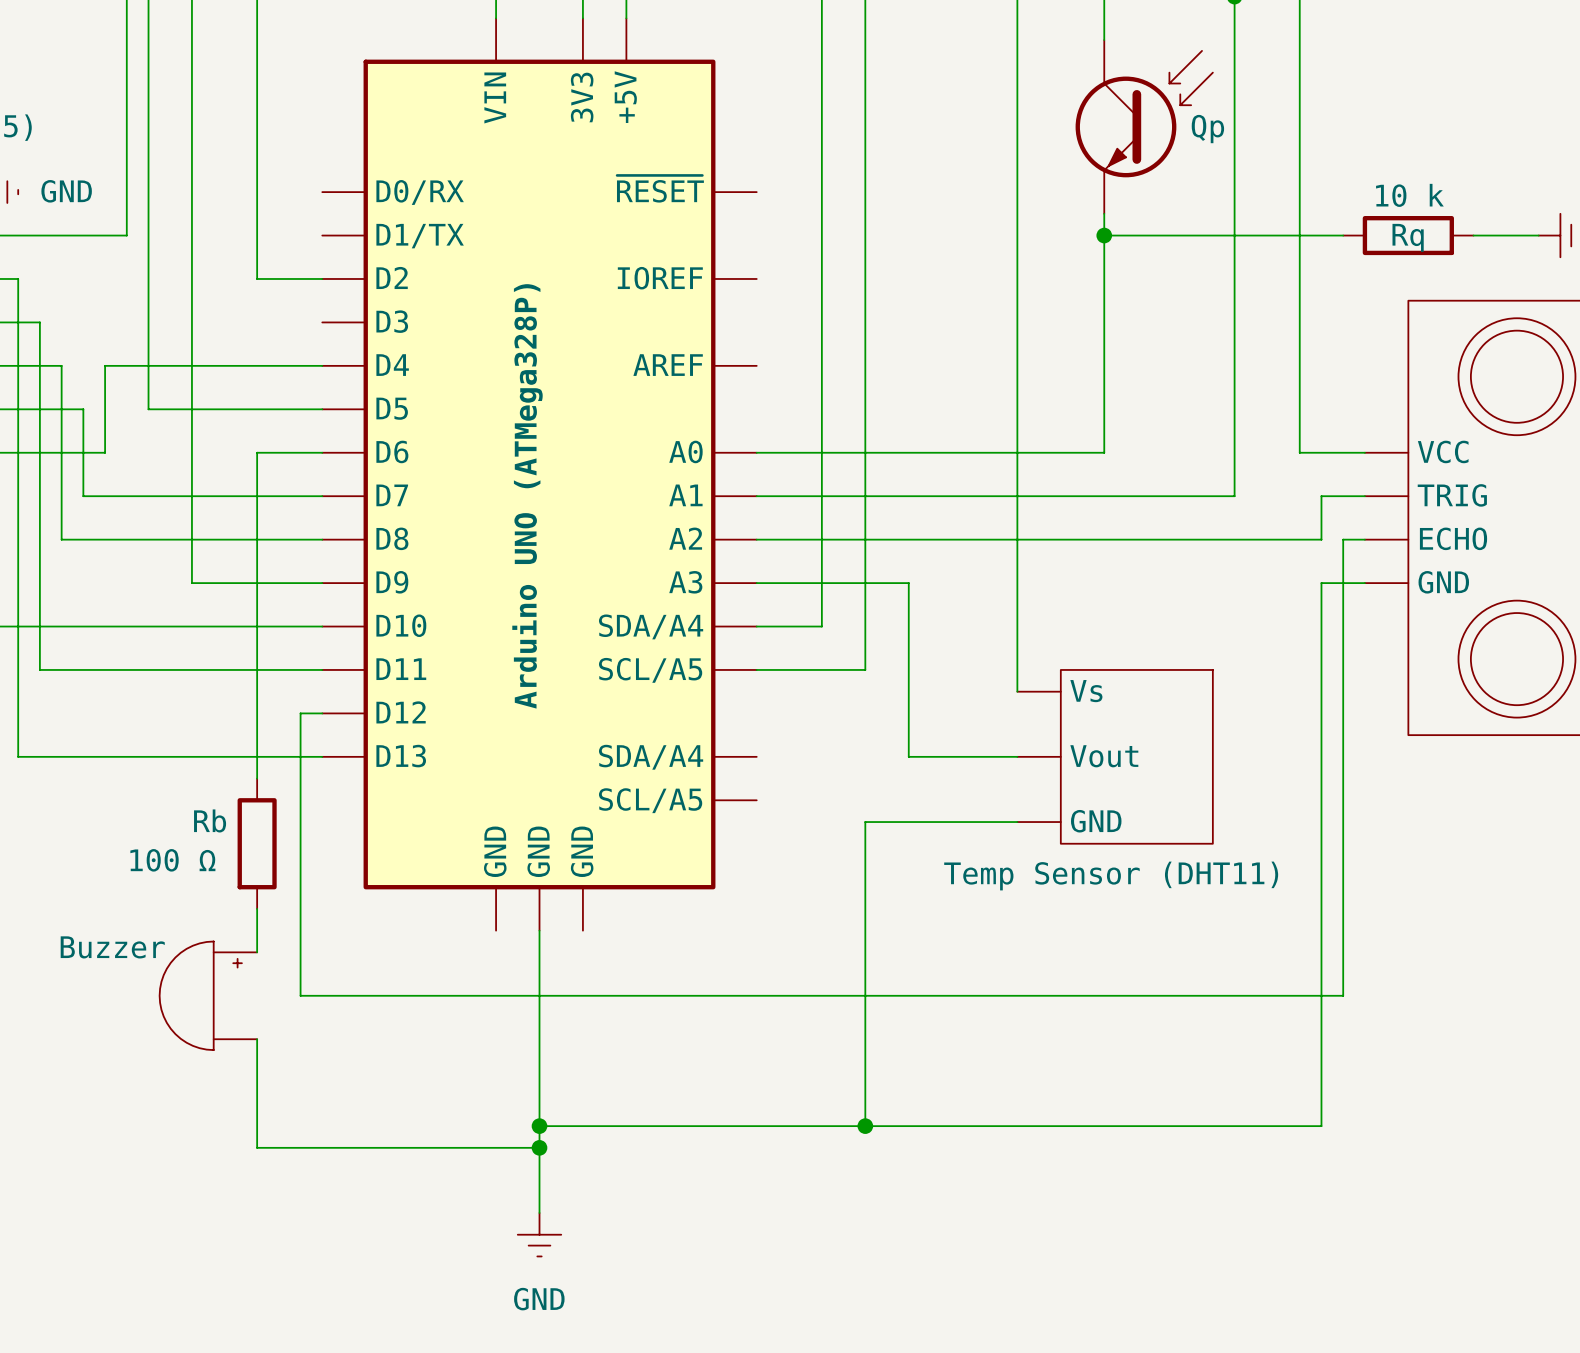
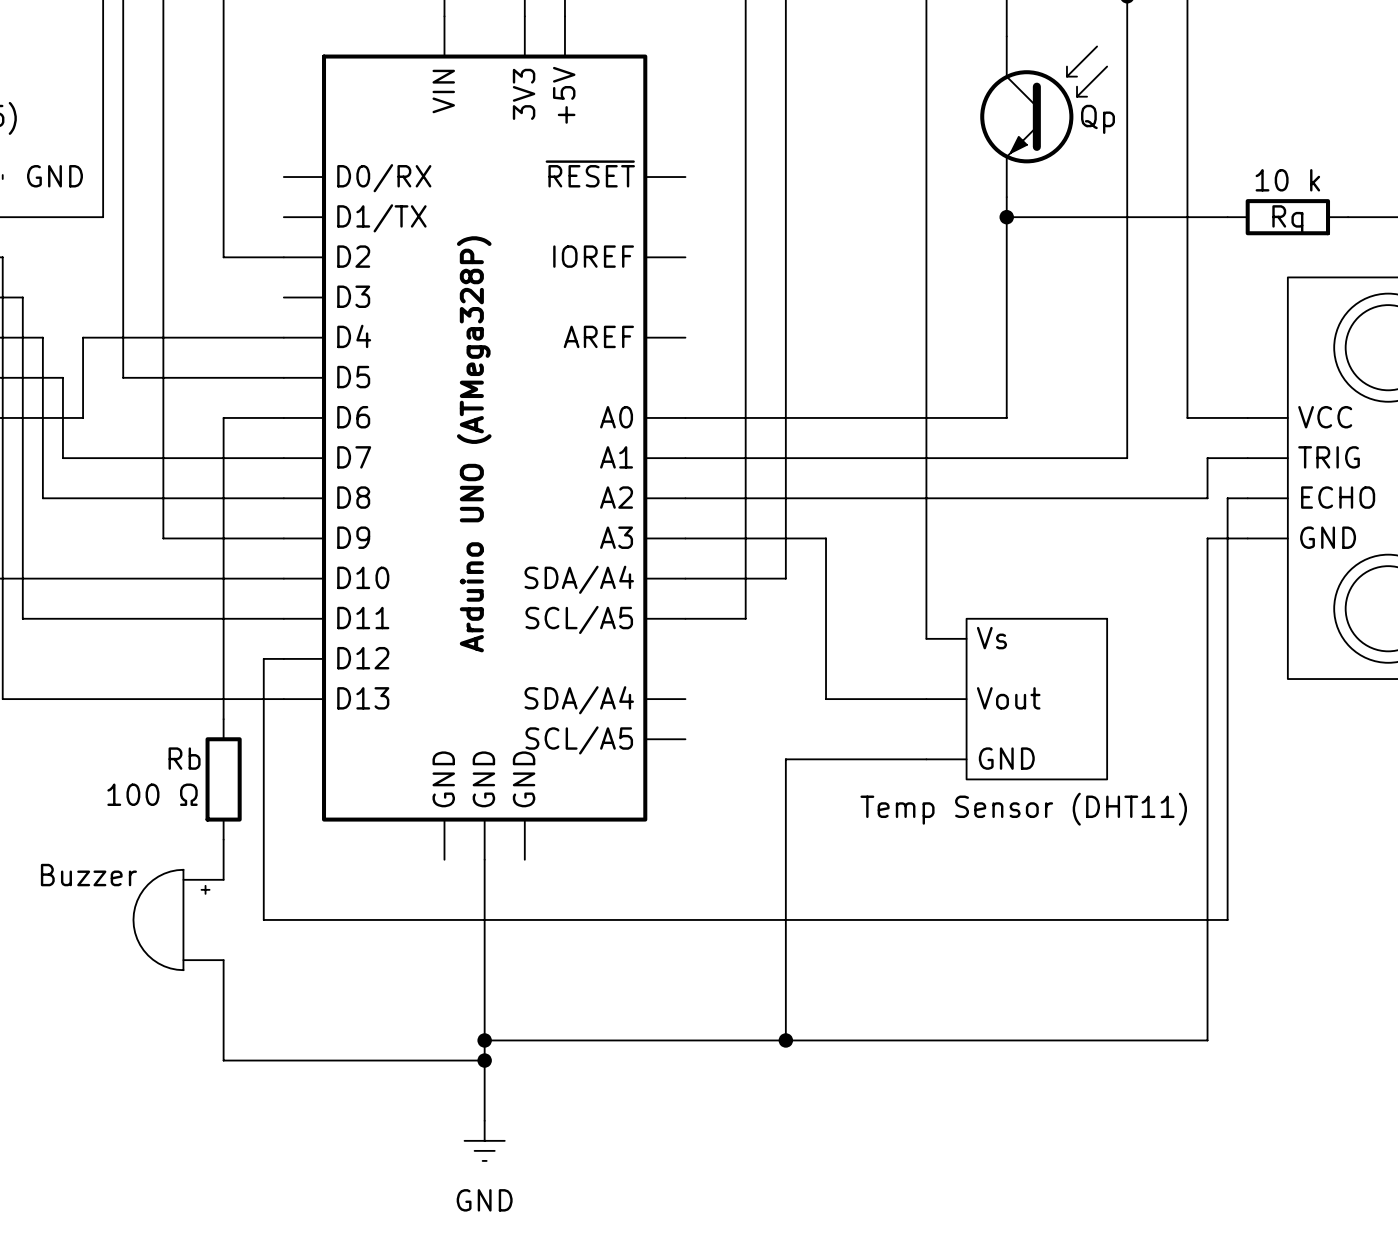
wire: (865, 626) (865, 669) (821, 669) -> (785, 578) (745, 578) (745, 618)

